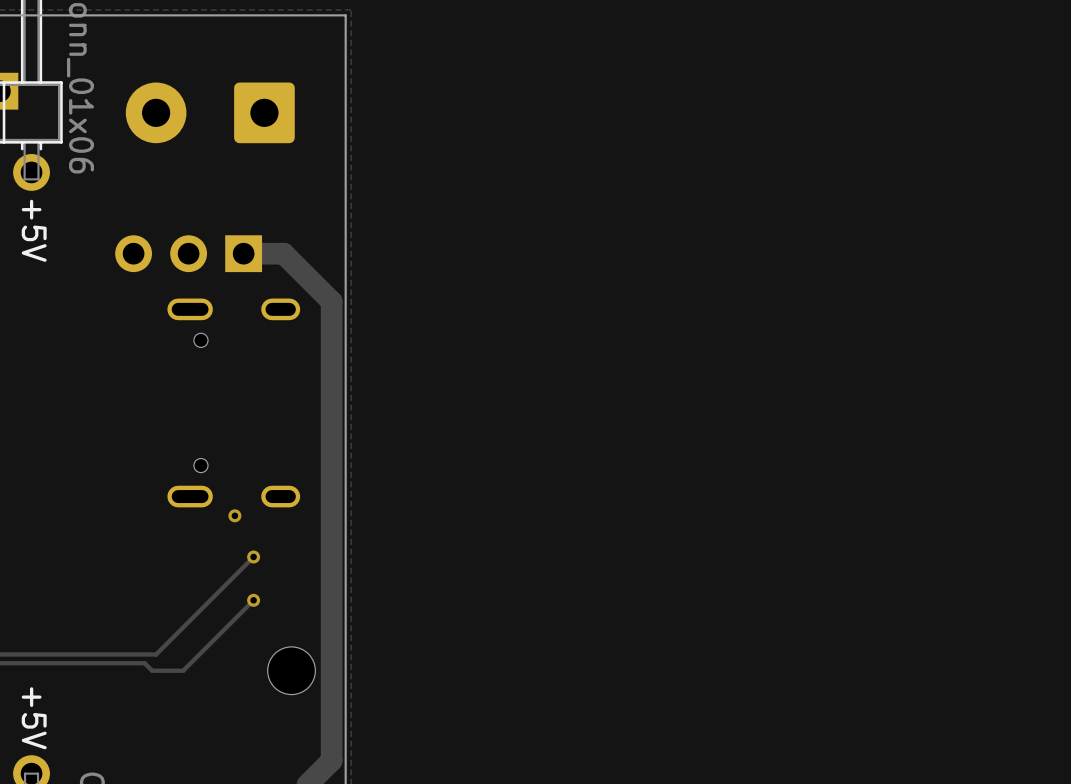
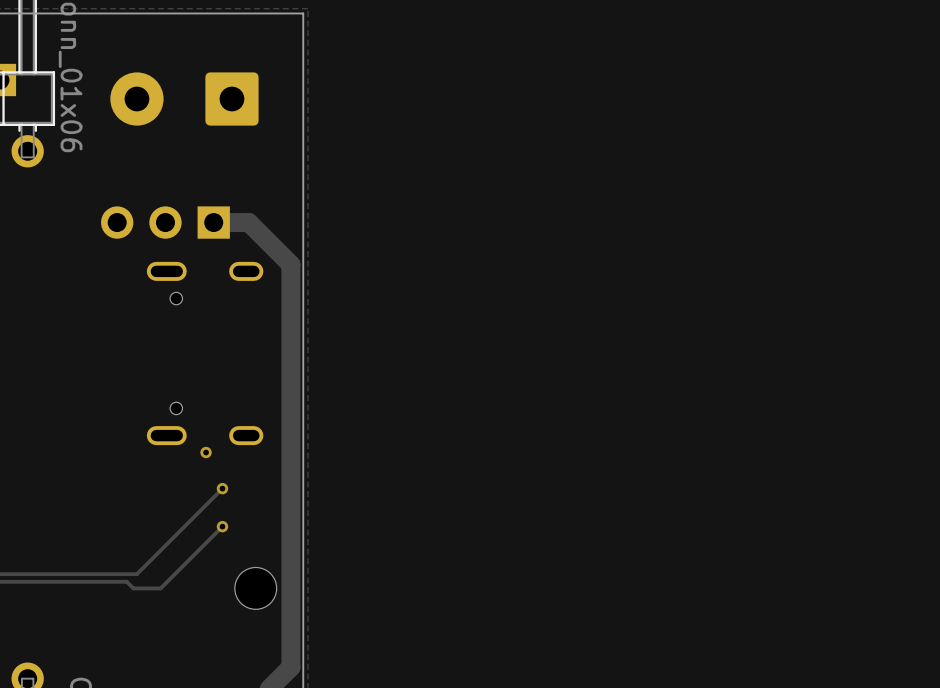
text: +5V (34, 230) -> none
text: +5V (34, 718) -> none

